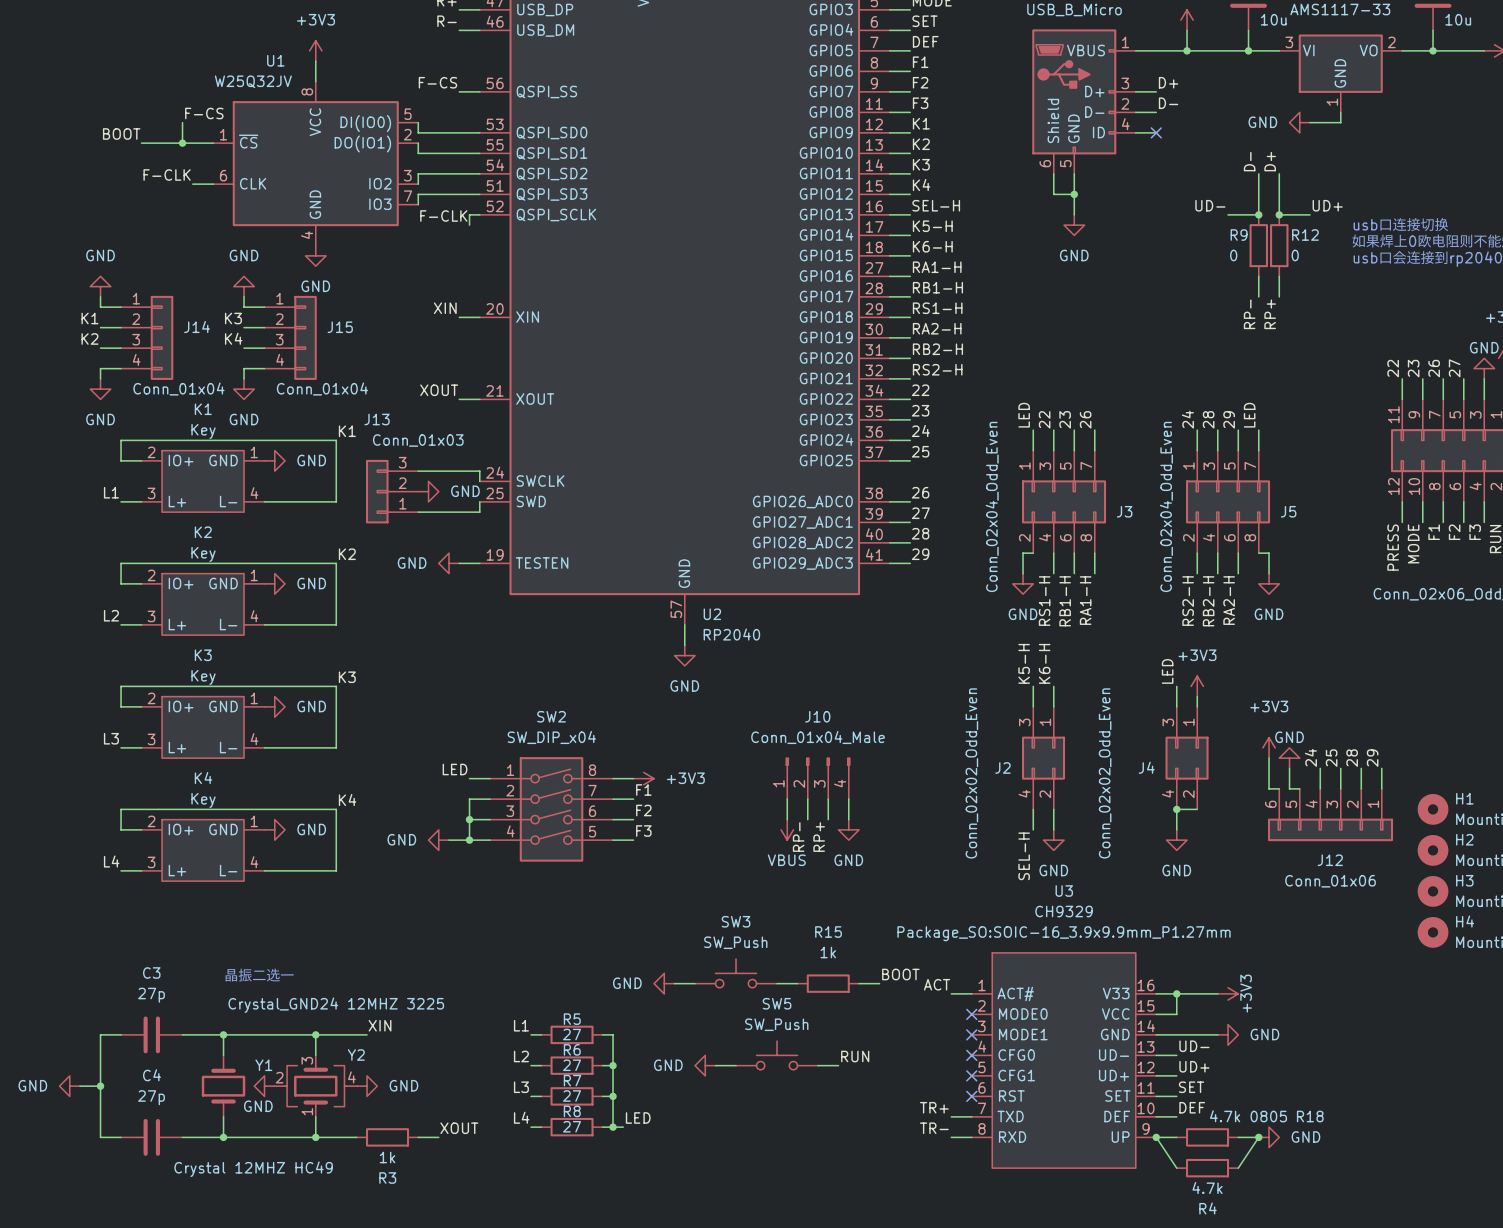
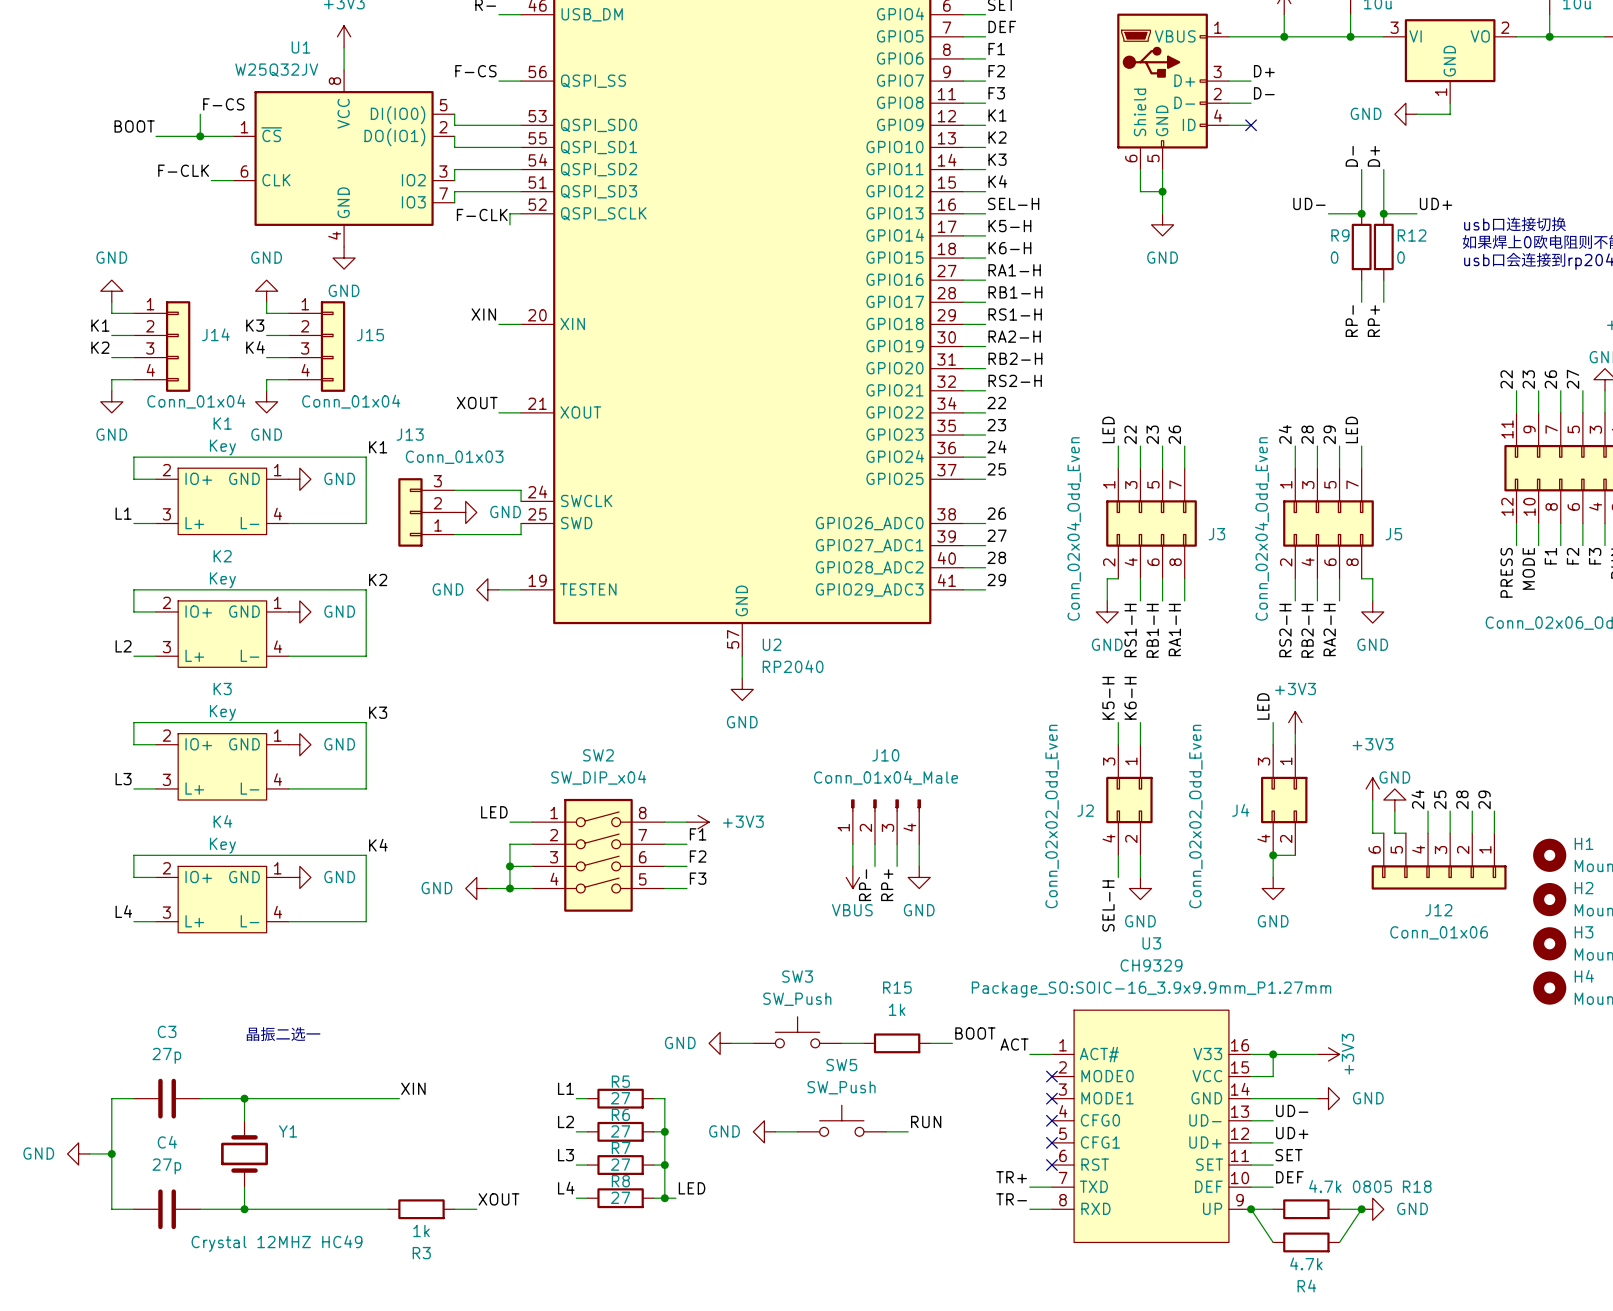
wire: (315, 1034) (315, 1055) -> none
junction: (315, 1034) -> none
power symbol: GND (264, 1086) -> none
Y2: Crystal_GND24 12MHZ 3225 (315, 1086) -> none
power symbol: GND (367, 1086) -> none
wire: (315, 1116) (315, 1137) -> none
junction: (315, 1137) -> none

